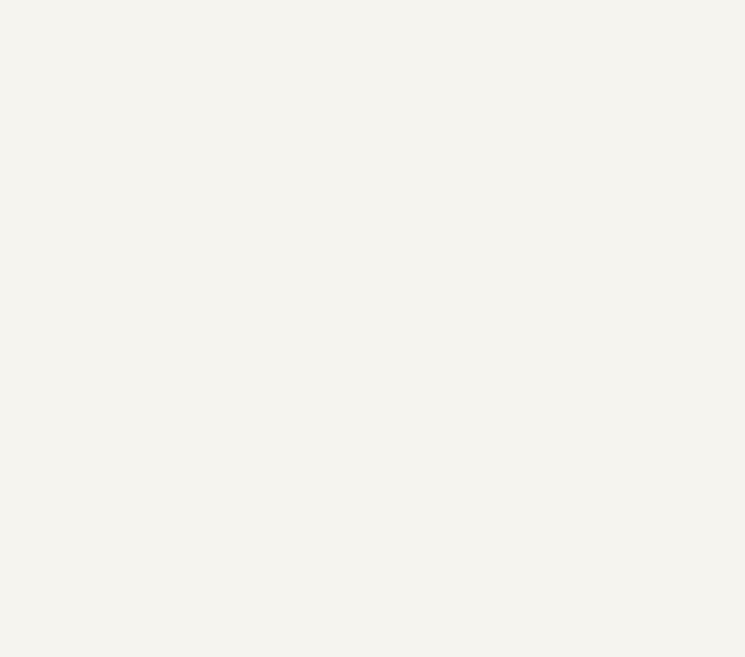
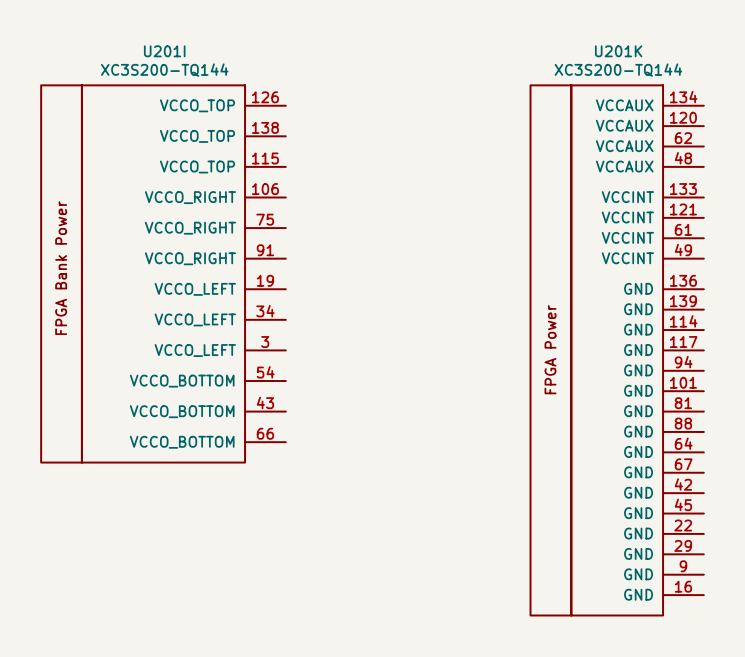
U201I: none -> XC3S200-TQ144 (163, 273)
U201K: none -> XC3S200-TQ144 (617, 350)

